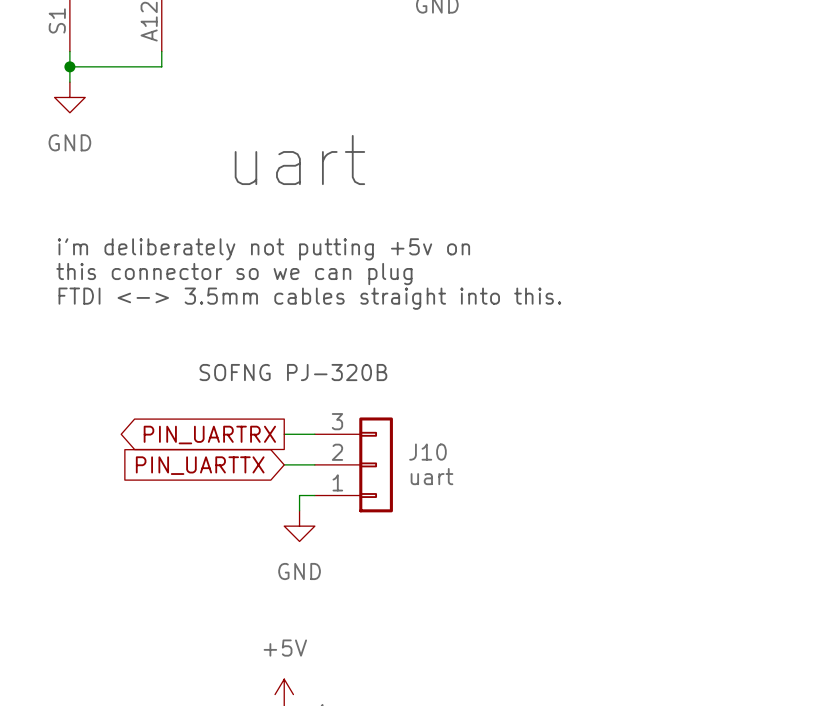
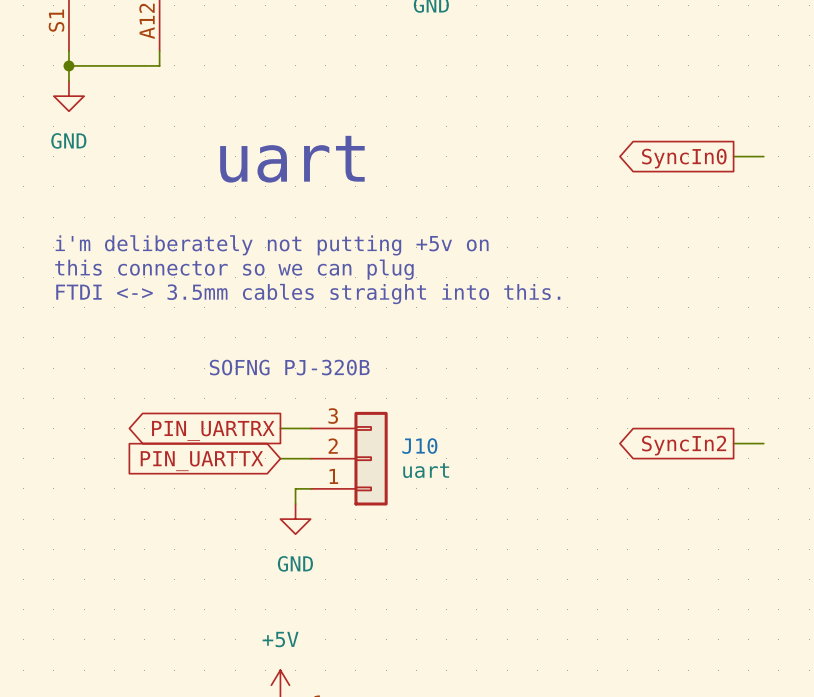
wire: none -> (733, 156) (763, 156)
global label: none -> SyncIn0 (684, 158)
wire: none -> (733, 443) (763, 443)
global label: none -> SyncIn2 (684, 445)

